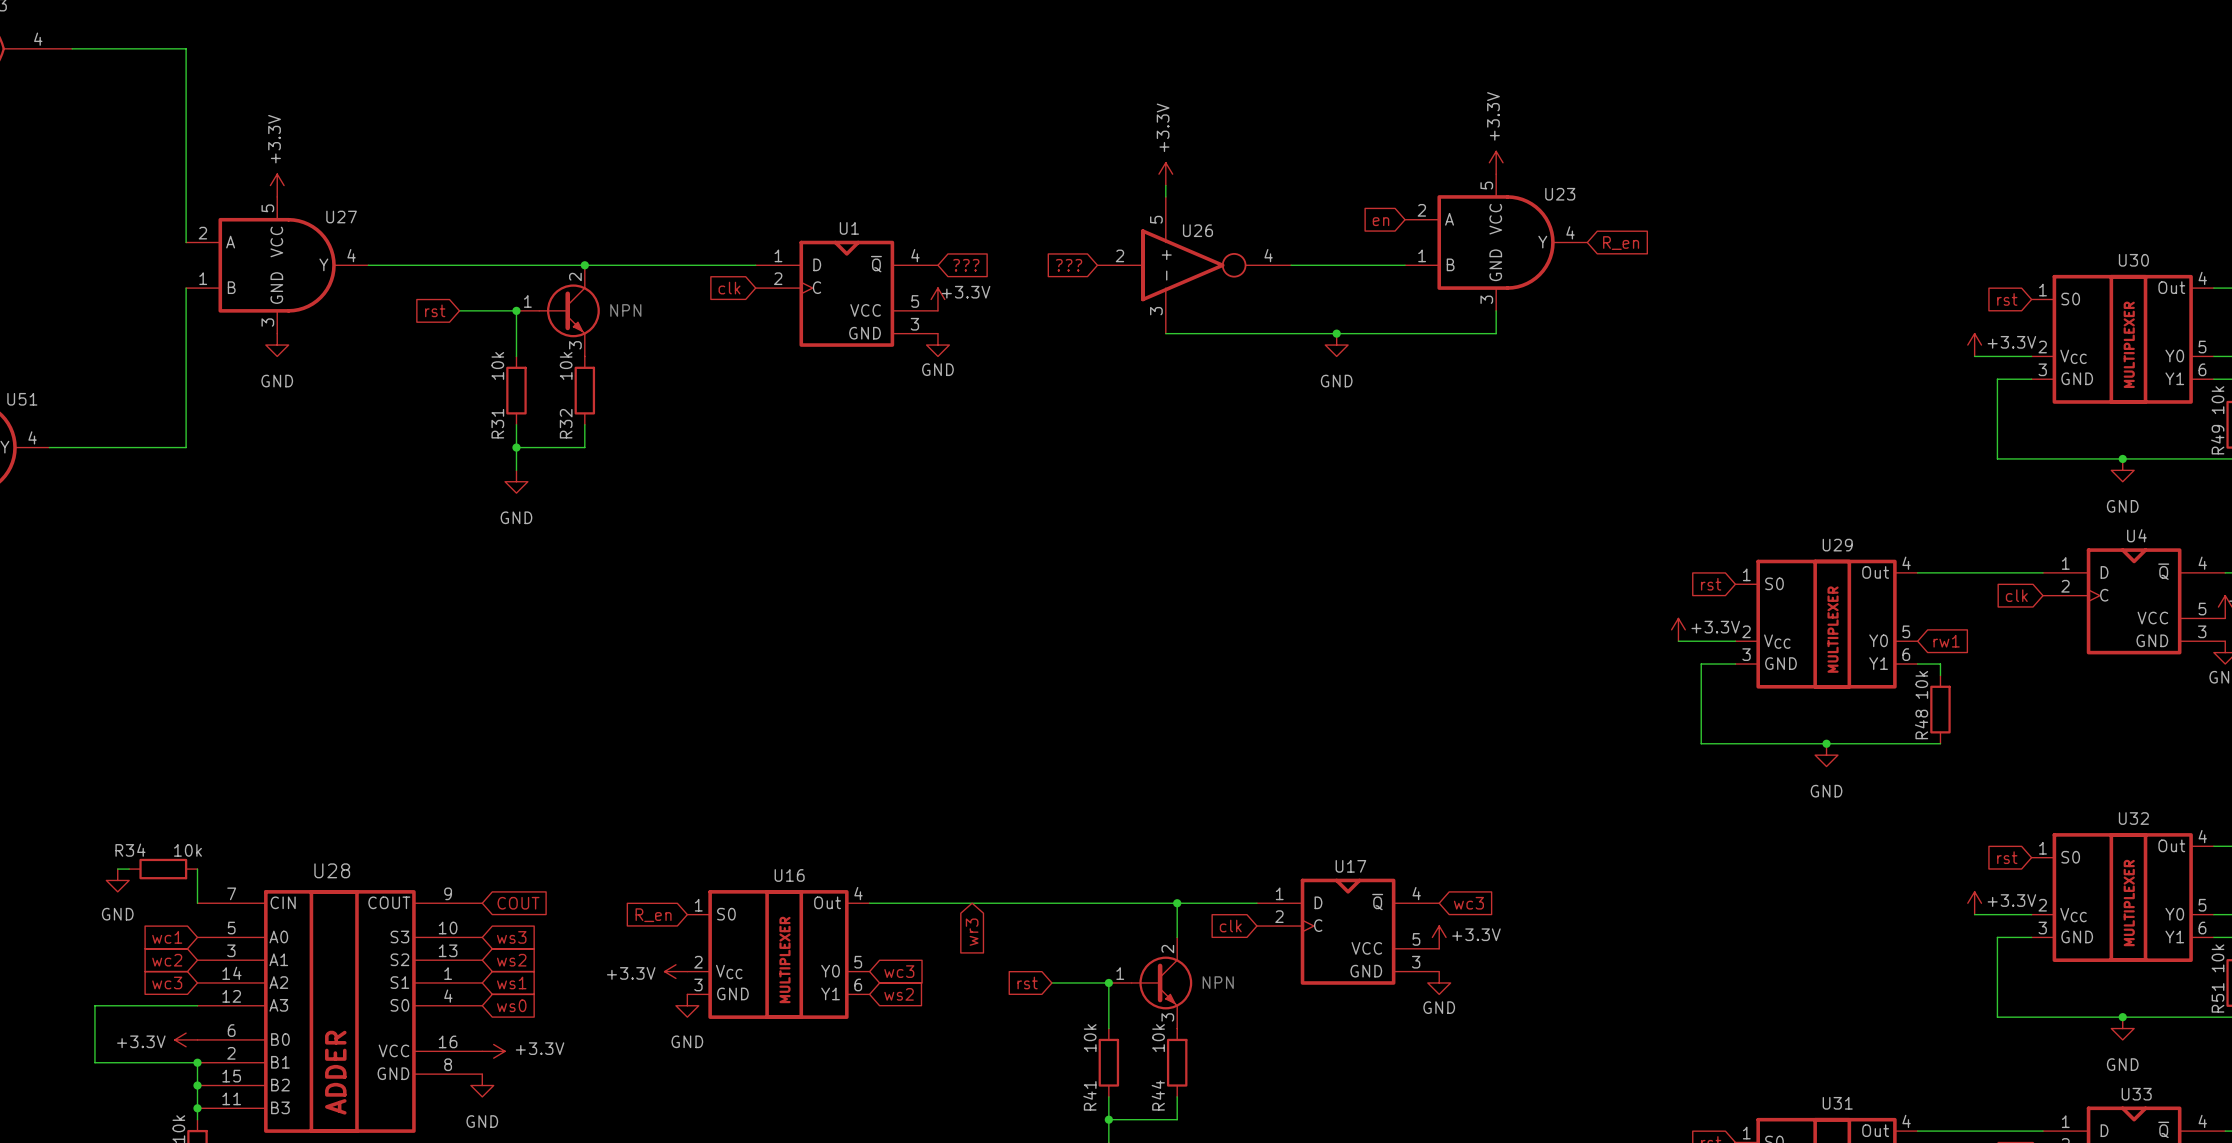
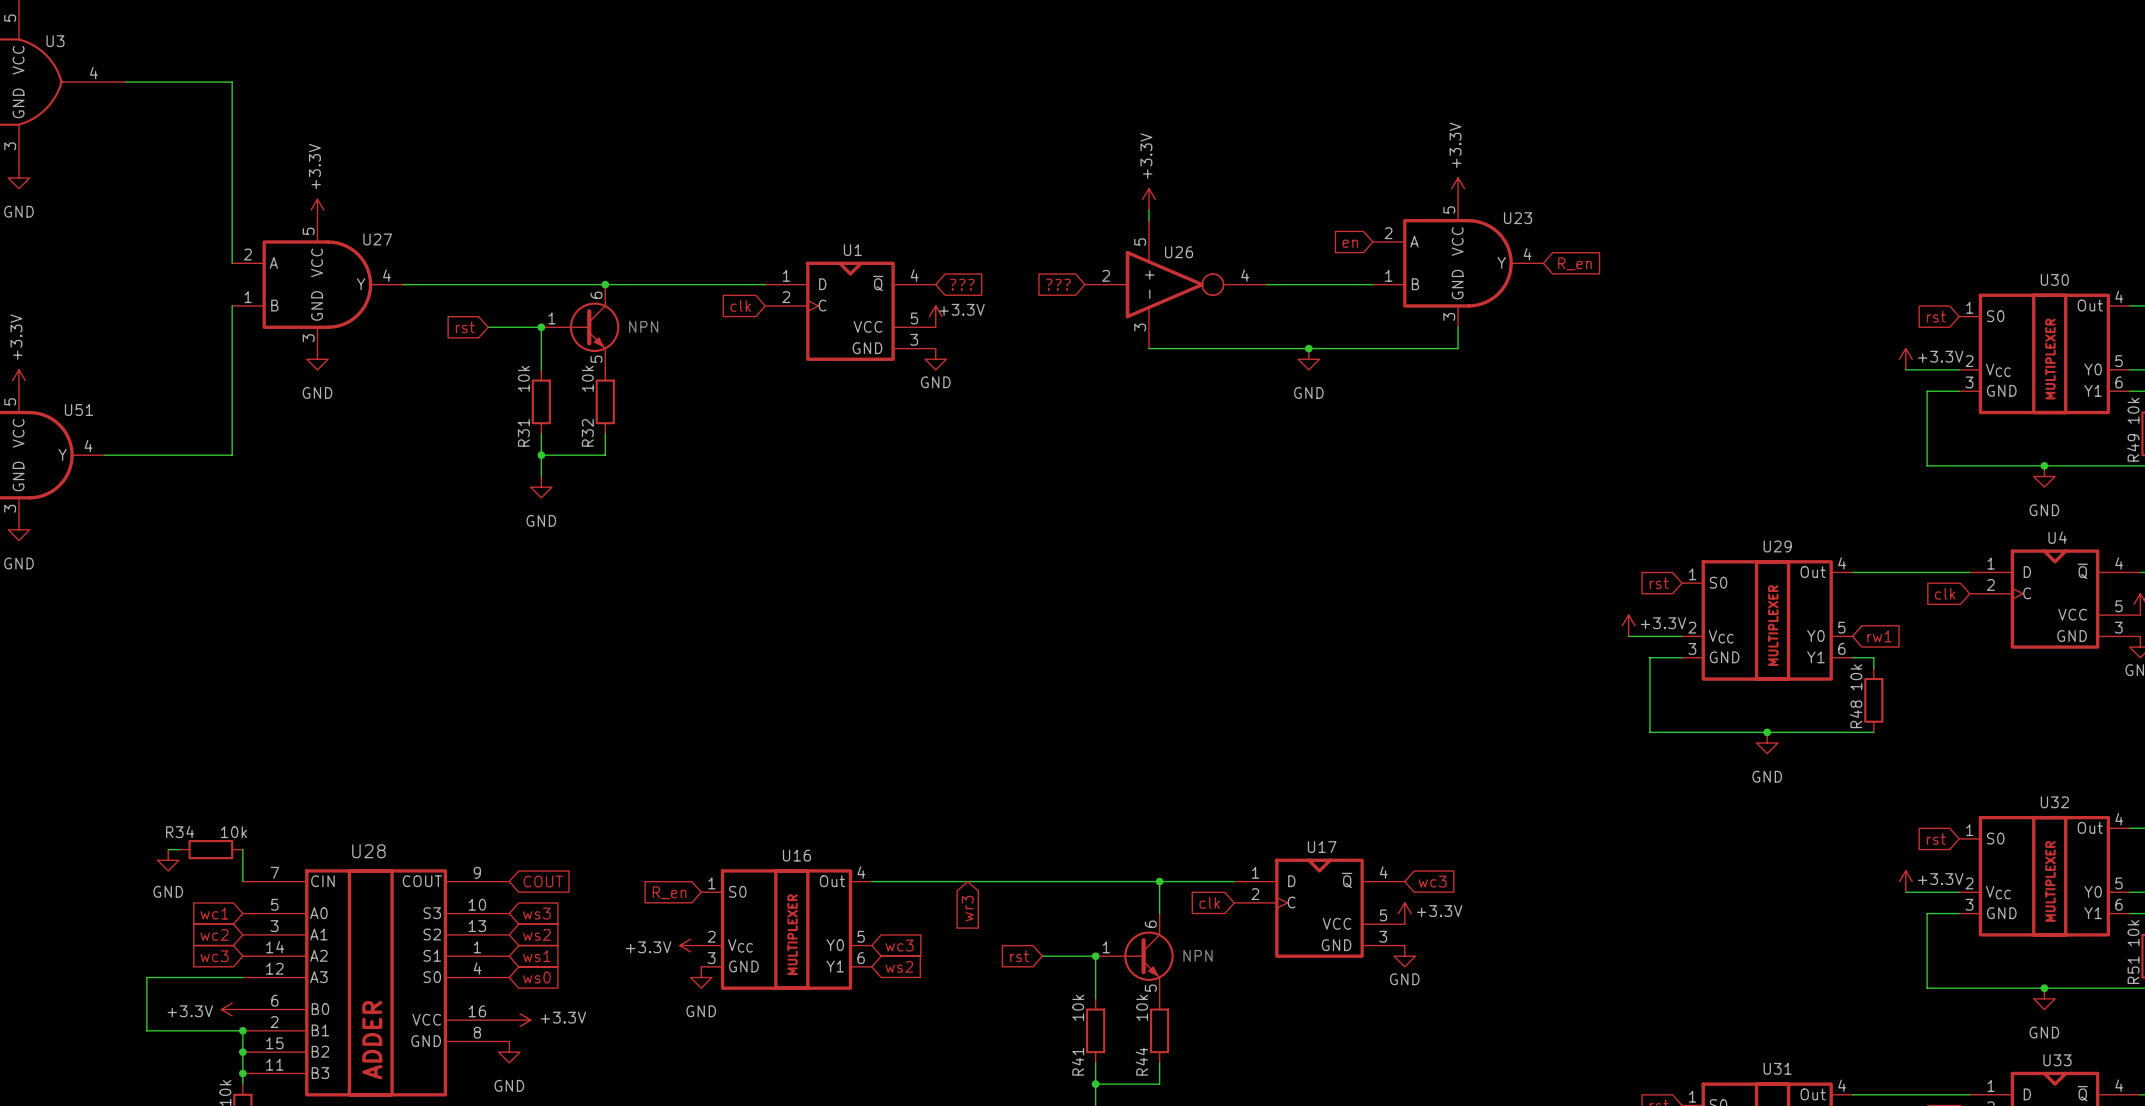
part pin number: 2 (575, 276) -> 6 (596, 295)
part pin number: 3 (575, 345) -> 5 (596, 359)
part pin number: 2 (1167, 949) -> 6 (1150, 924)
part pin number: 3 (1167, 1017) -> 5 (1150, 988)

